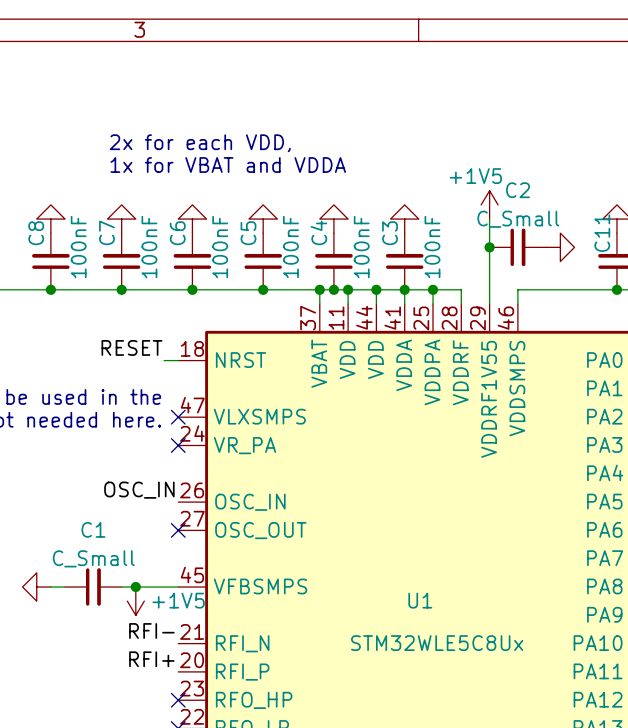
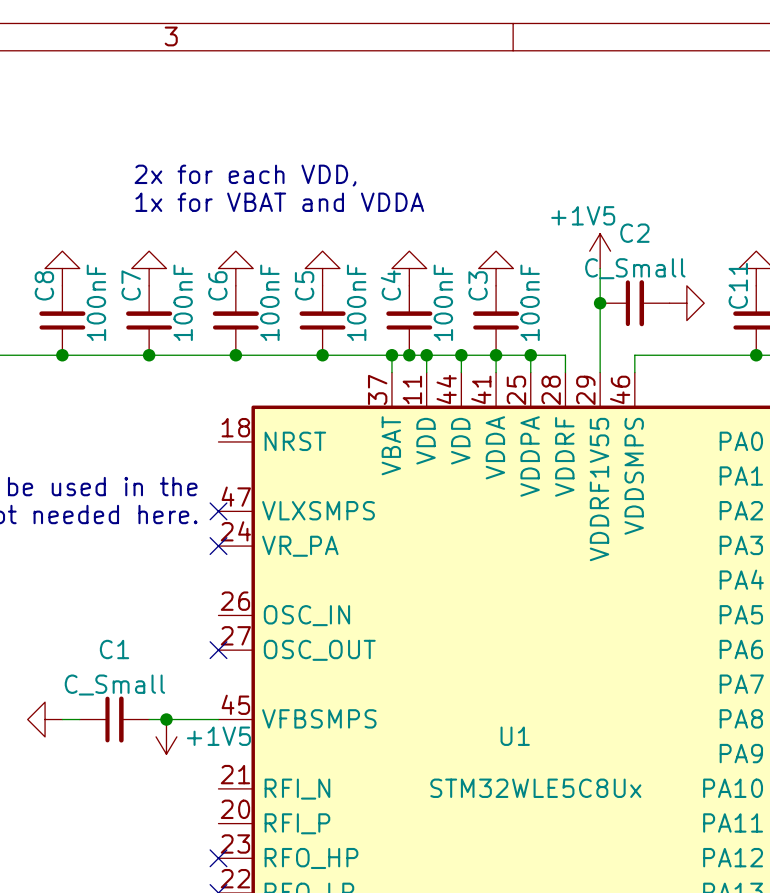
label: RESET (131, 347) -> none
wire: (164, 360) (178, 360) -> none
label: OSC_IN (139, 490) -> none
label: RFI- (151, 630) -> none
label: RFI+ (151, 659) -> none

